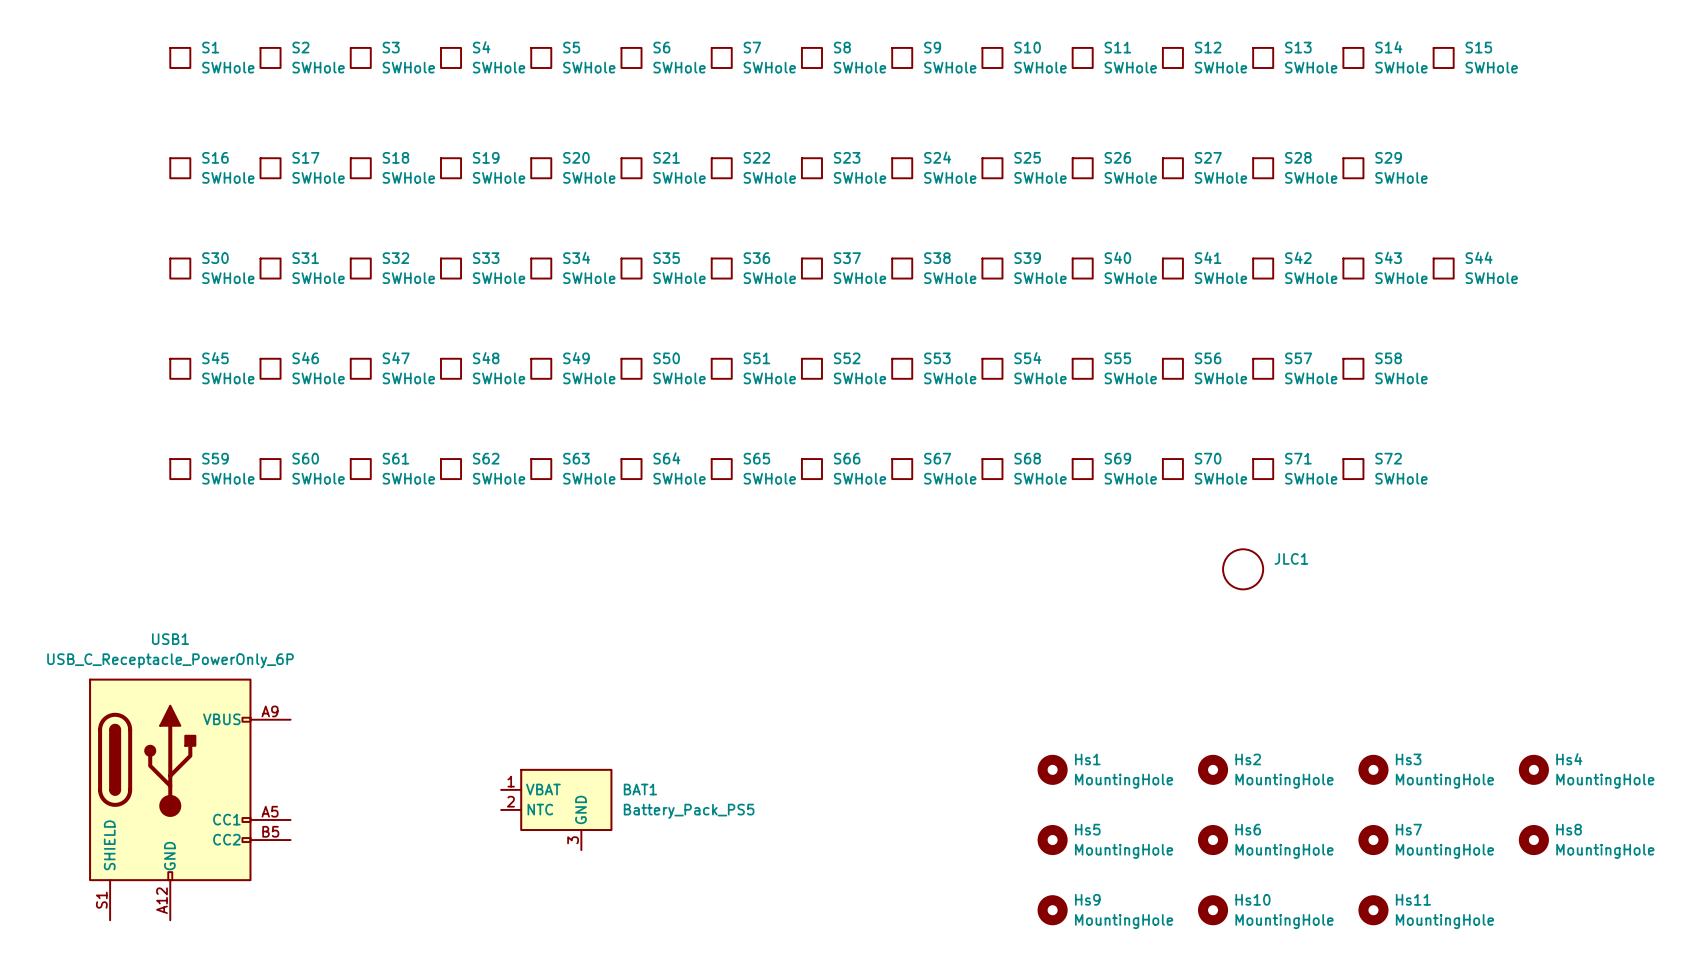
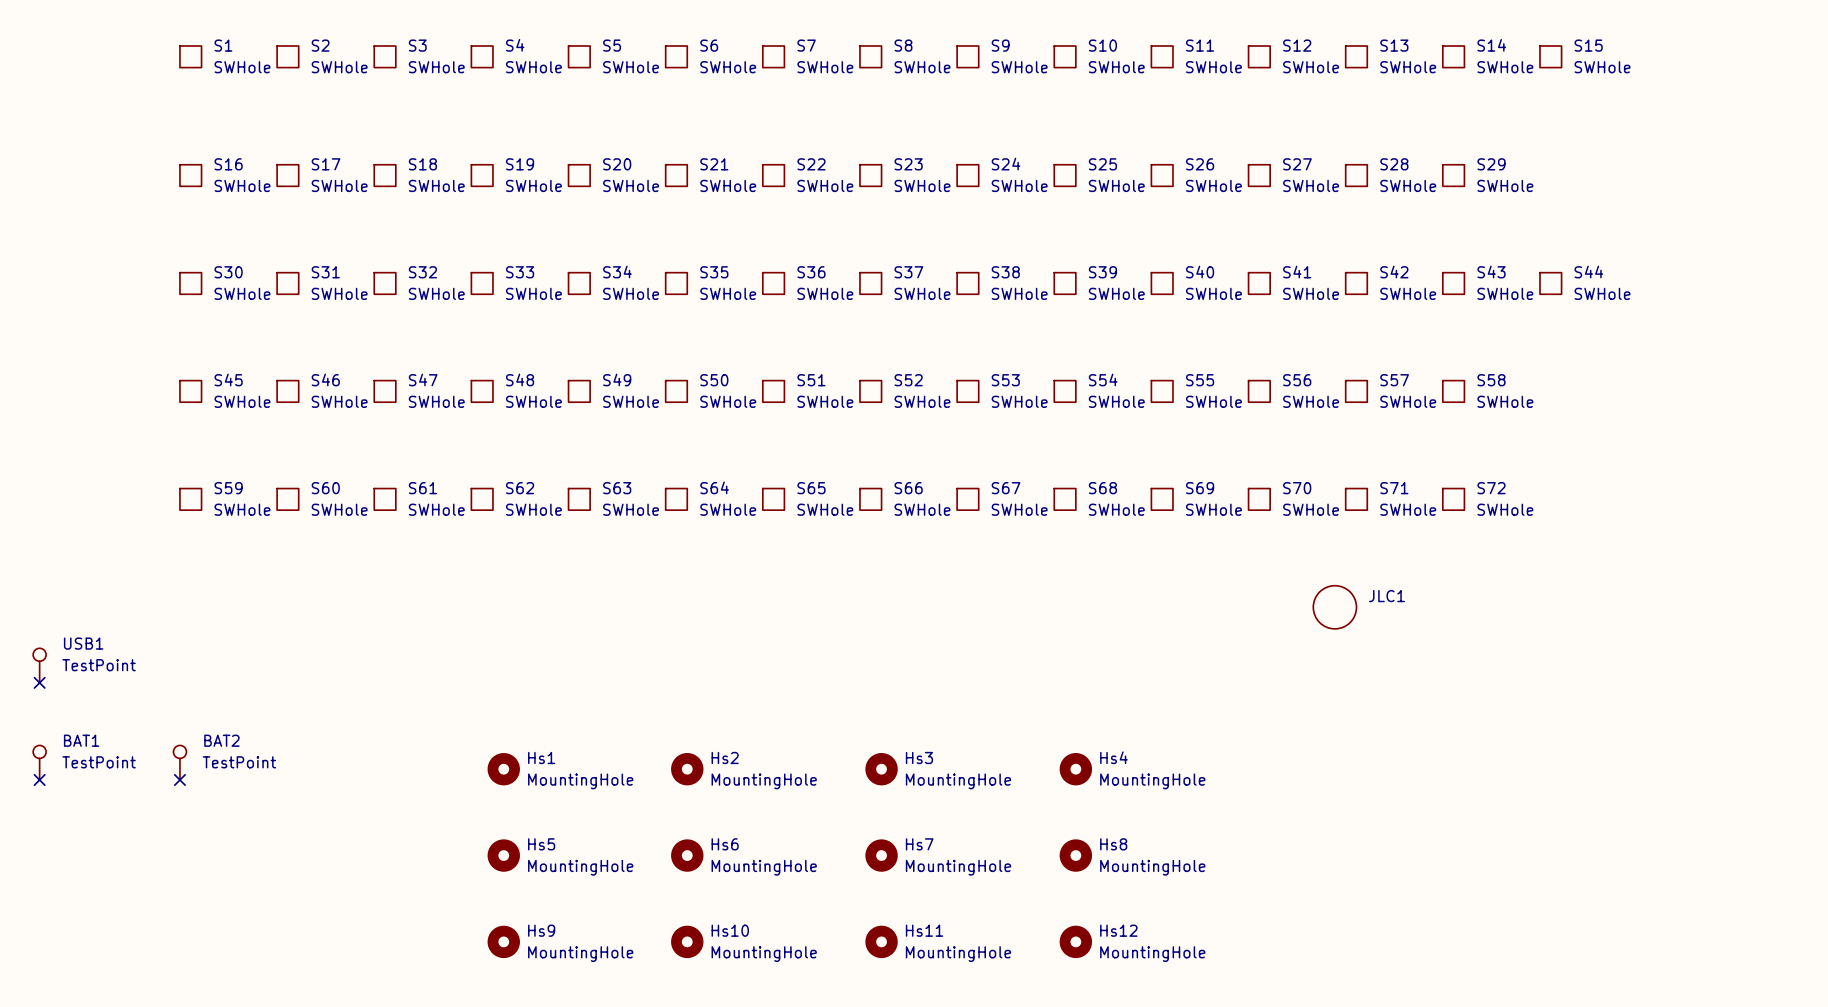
no-connect mark: none -> (39, 682)
USB1 name position: USB1 (170, 639) -> USB1 (83, 643)
USB1 value: USB_C_Receptacle_PowerOnly_6P (170, 660) -> TestPoint (99, 665)
USB1 symbol: [89, 678, 291, 921] -> [33, 648, 47, 683]
BAT2: none -> TestPoint (179, 762)
no-connect mark: none -> (39, 779)
no-connect mark: none -> (179, 779)
BAT1 symbol: [501, 768, 613, 851] -> [33, 745, 47, 780]
Hs1 position: (1052, 769) -> (503, 769)
Hs2 position: (1213, 769) -> (687, 769)
Hs3 position: (1373, 769) -> (881, 769)
Hs4 position: (1533, 769) -> (1075, 769)
BAT1 name position: BAT1 (640, 789) -> BAT1 (81, 740)
BAT1 value: Battery_Pack_PS5 (689, 811) -> TestPoint (99, 762)
Hs5 position: (1052, 840) -> (503, 855)
Hs6 position: (1213, 840) -> (687, 855)
Hs7 position: (1373, 840) -> (881, 855)
Hs8 position: (1533, 840) -> (1075, 855)
Hs12: none -> MountingHole (1075, 941)
Hs9 position: (1052, 910) -> (503, 941)
Hs10 position: (1213, 910) -> (687, 941)
Hs11 position: (1373, 910) -> (881, 941)

